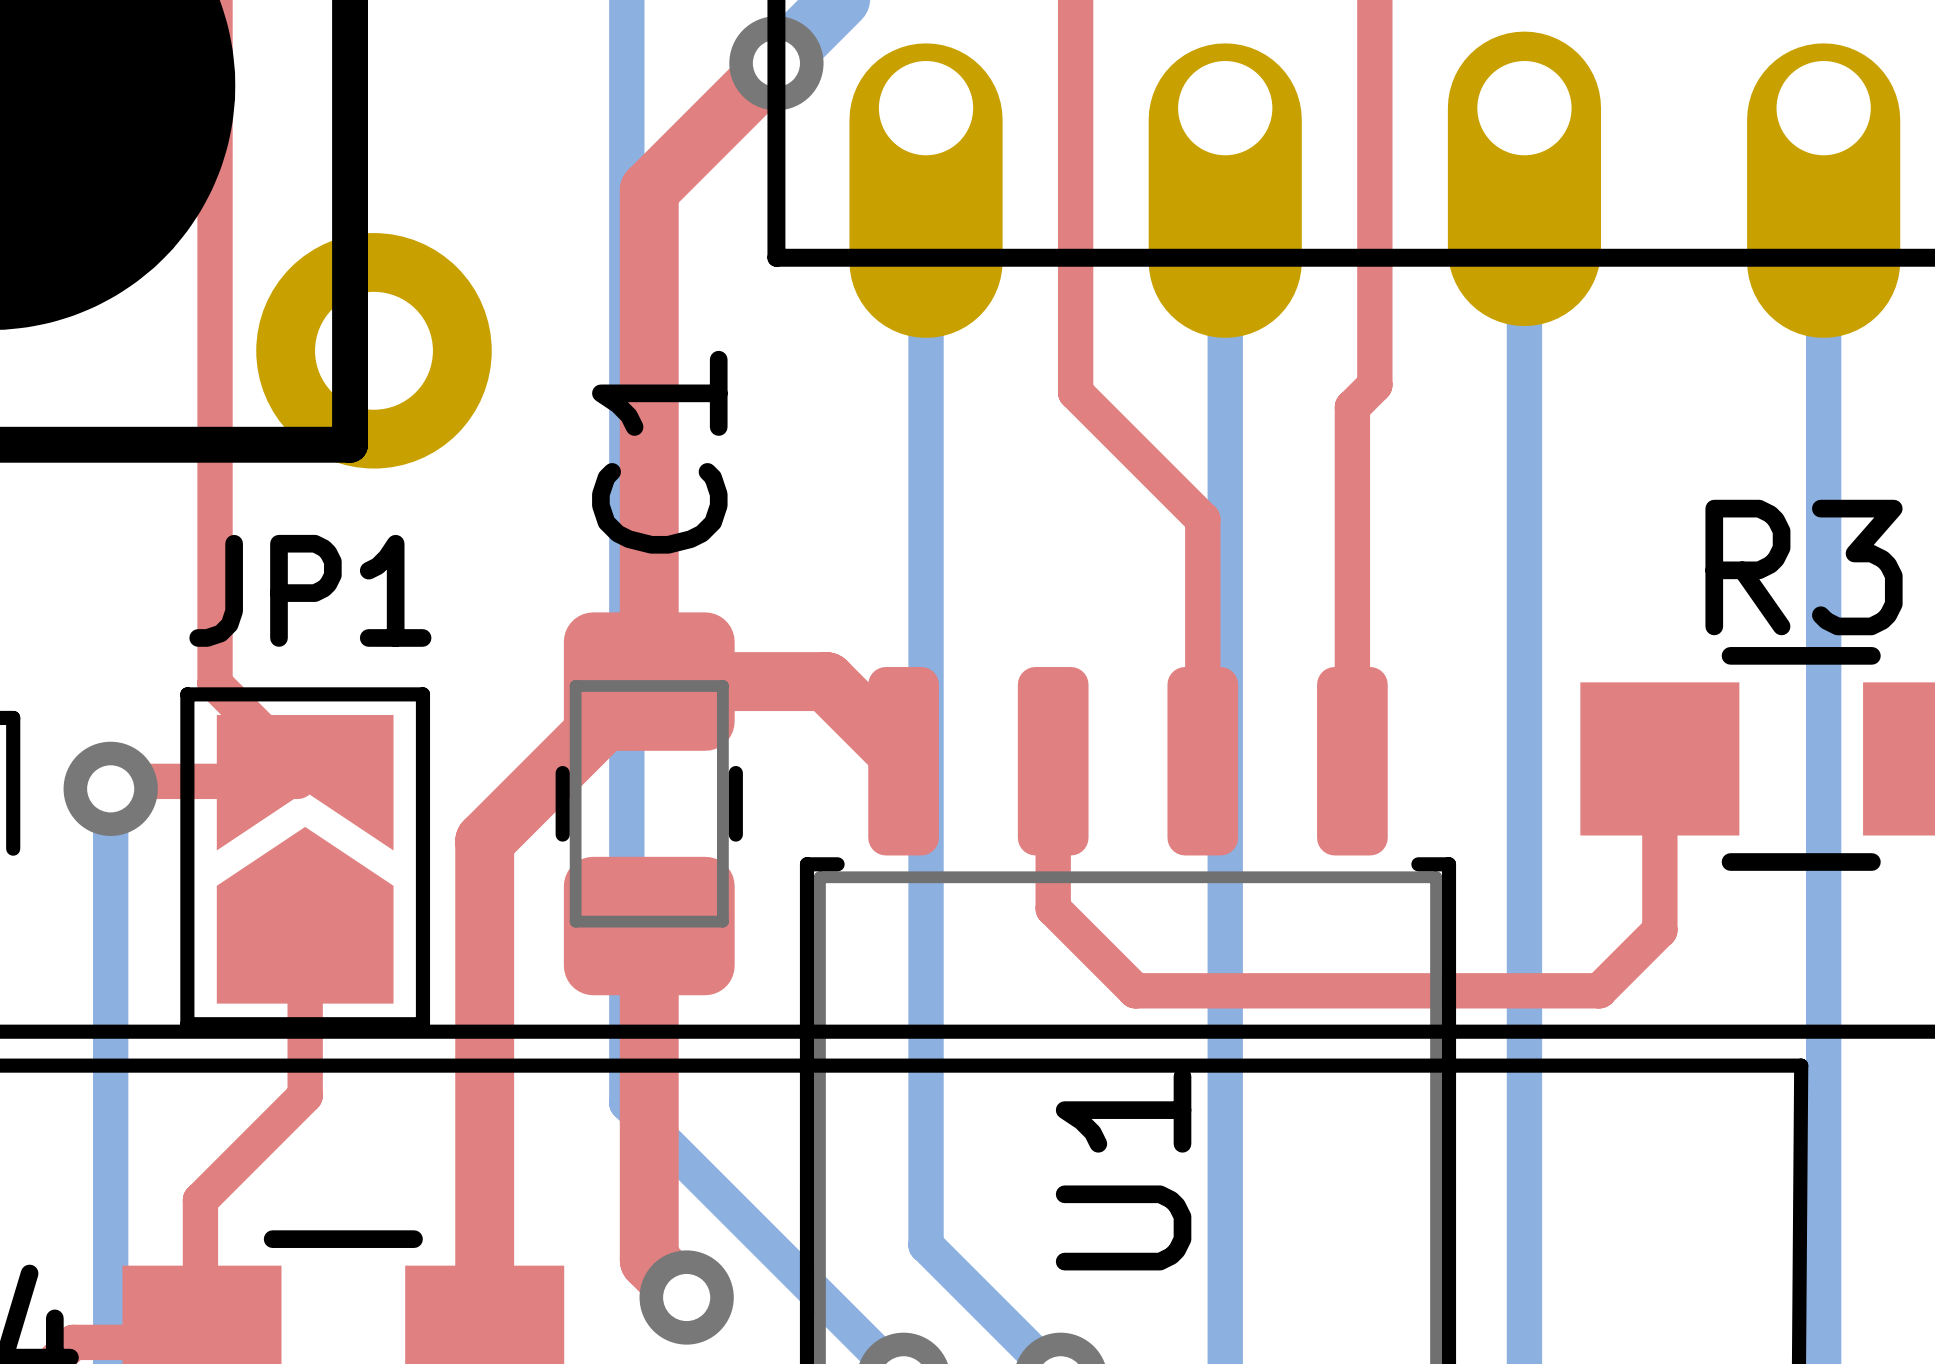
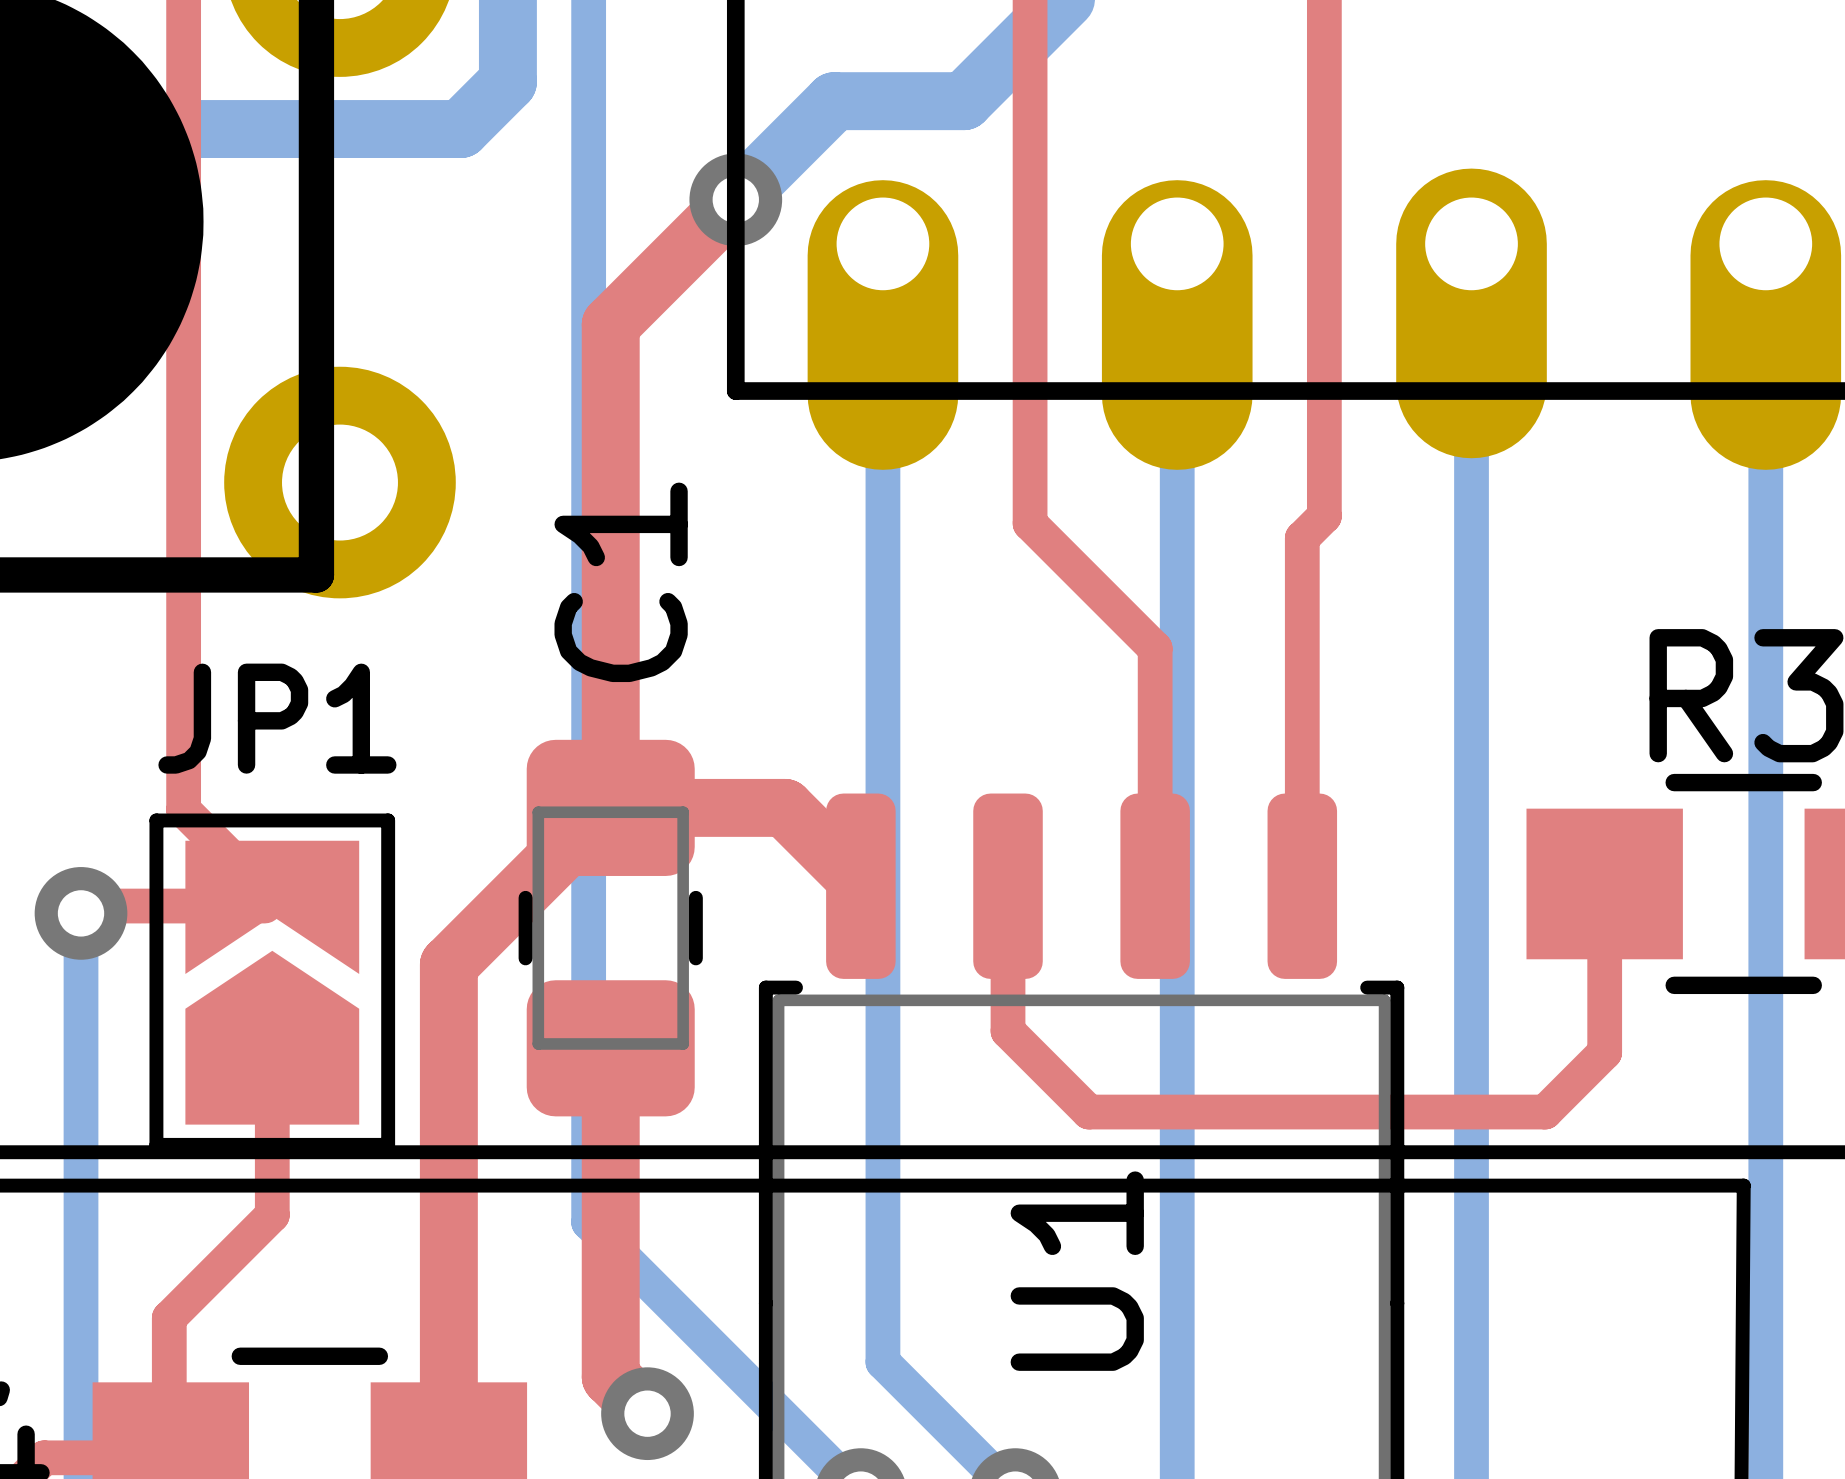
U1 name position: U1 (1123, 1169) -> U1 (1077, 1271)

